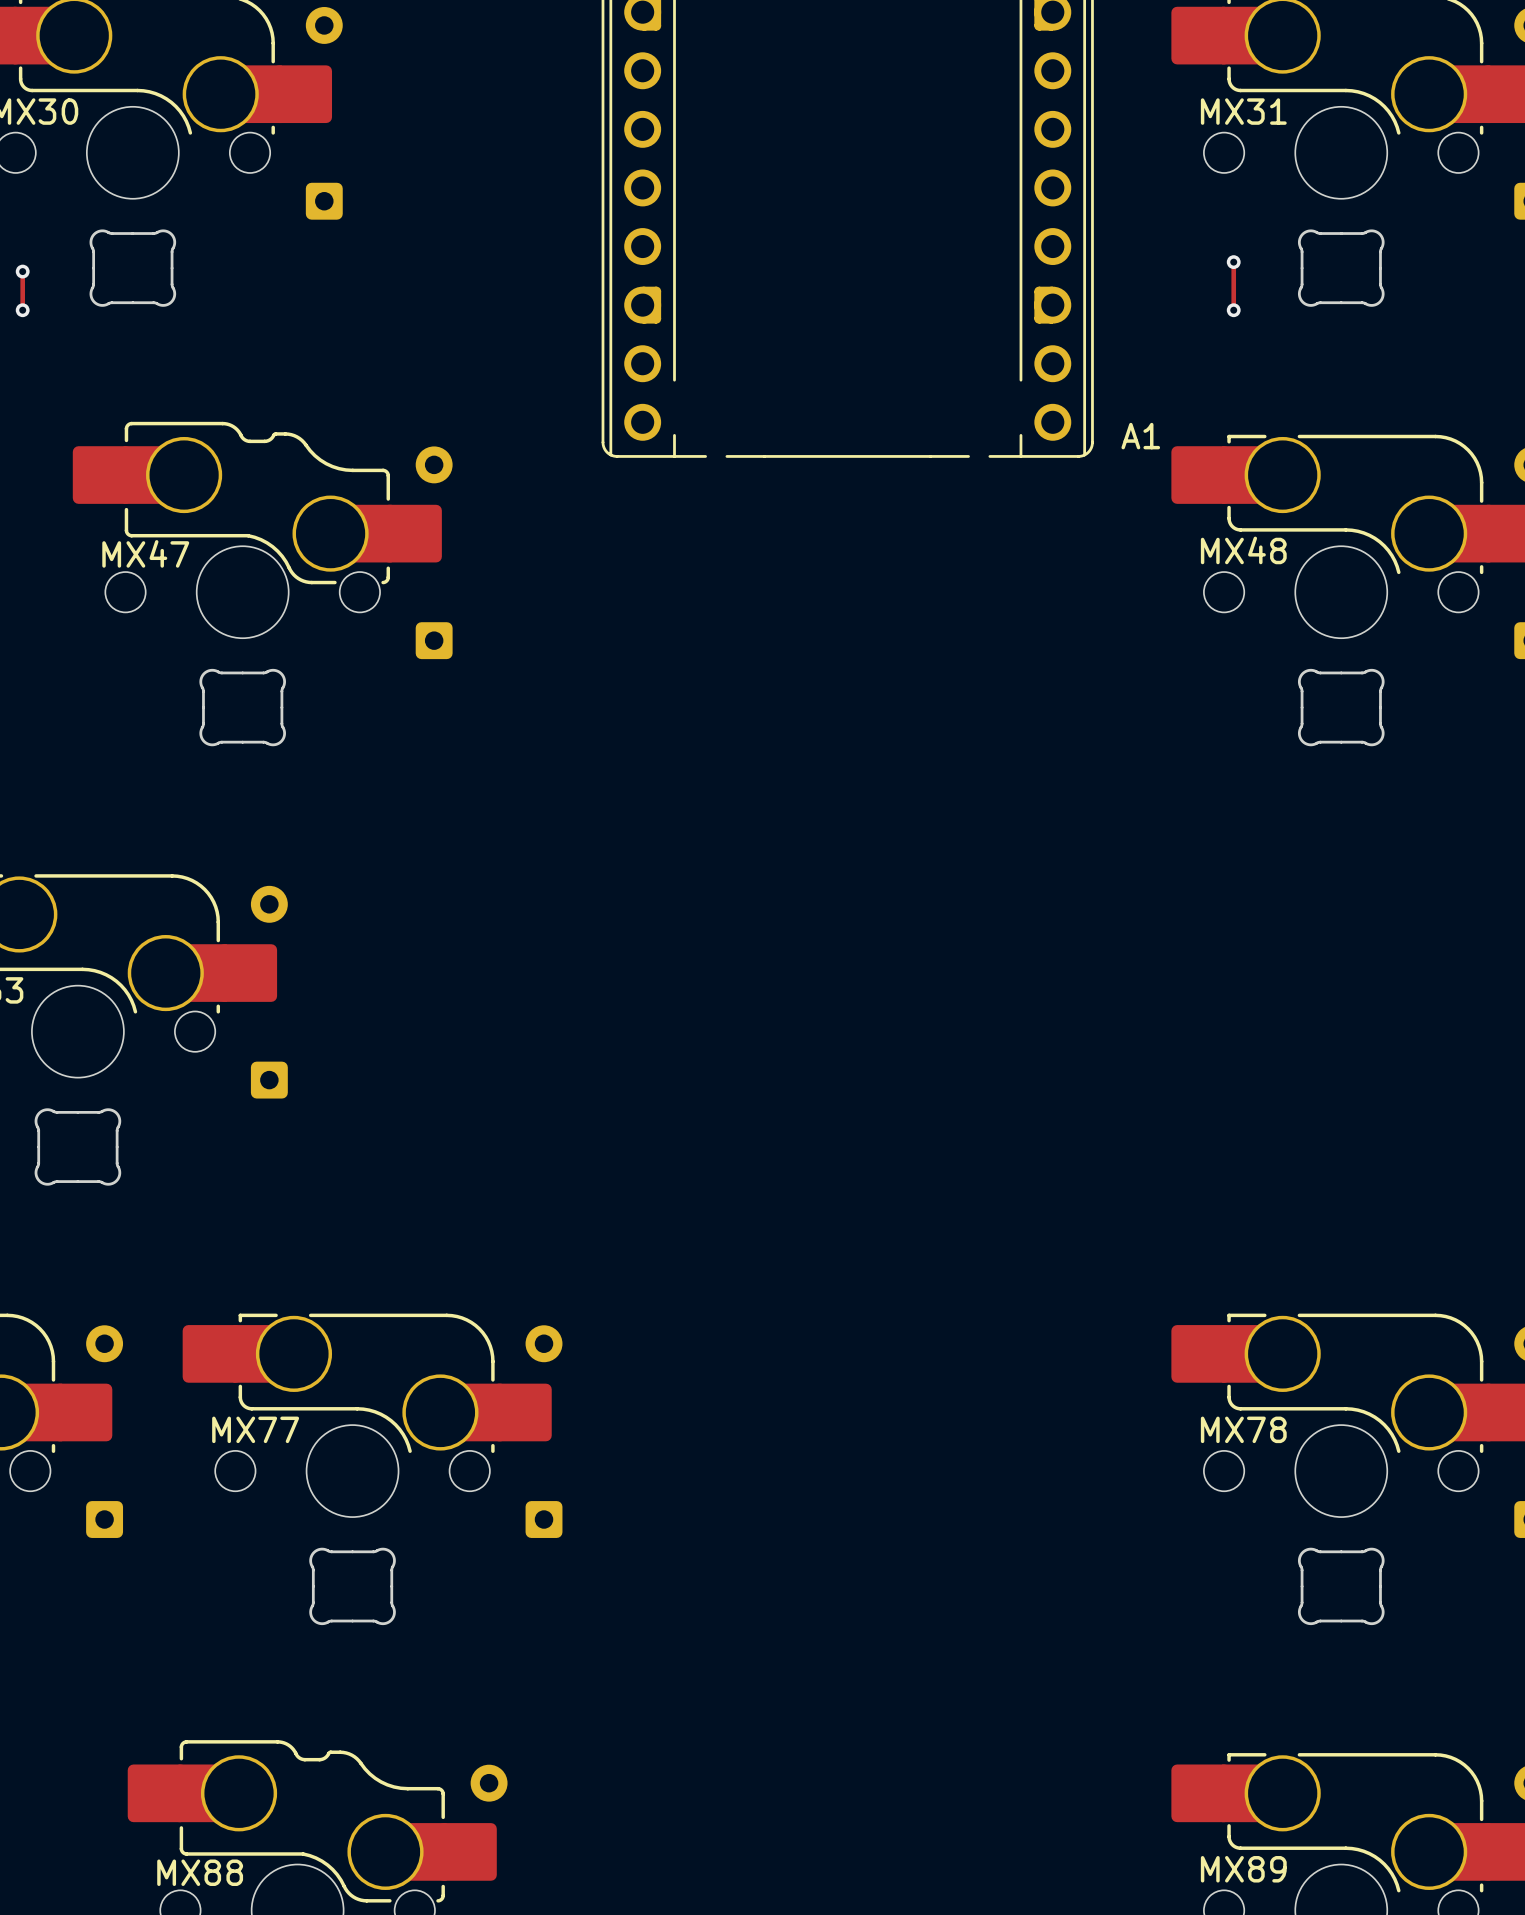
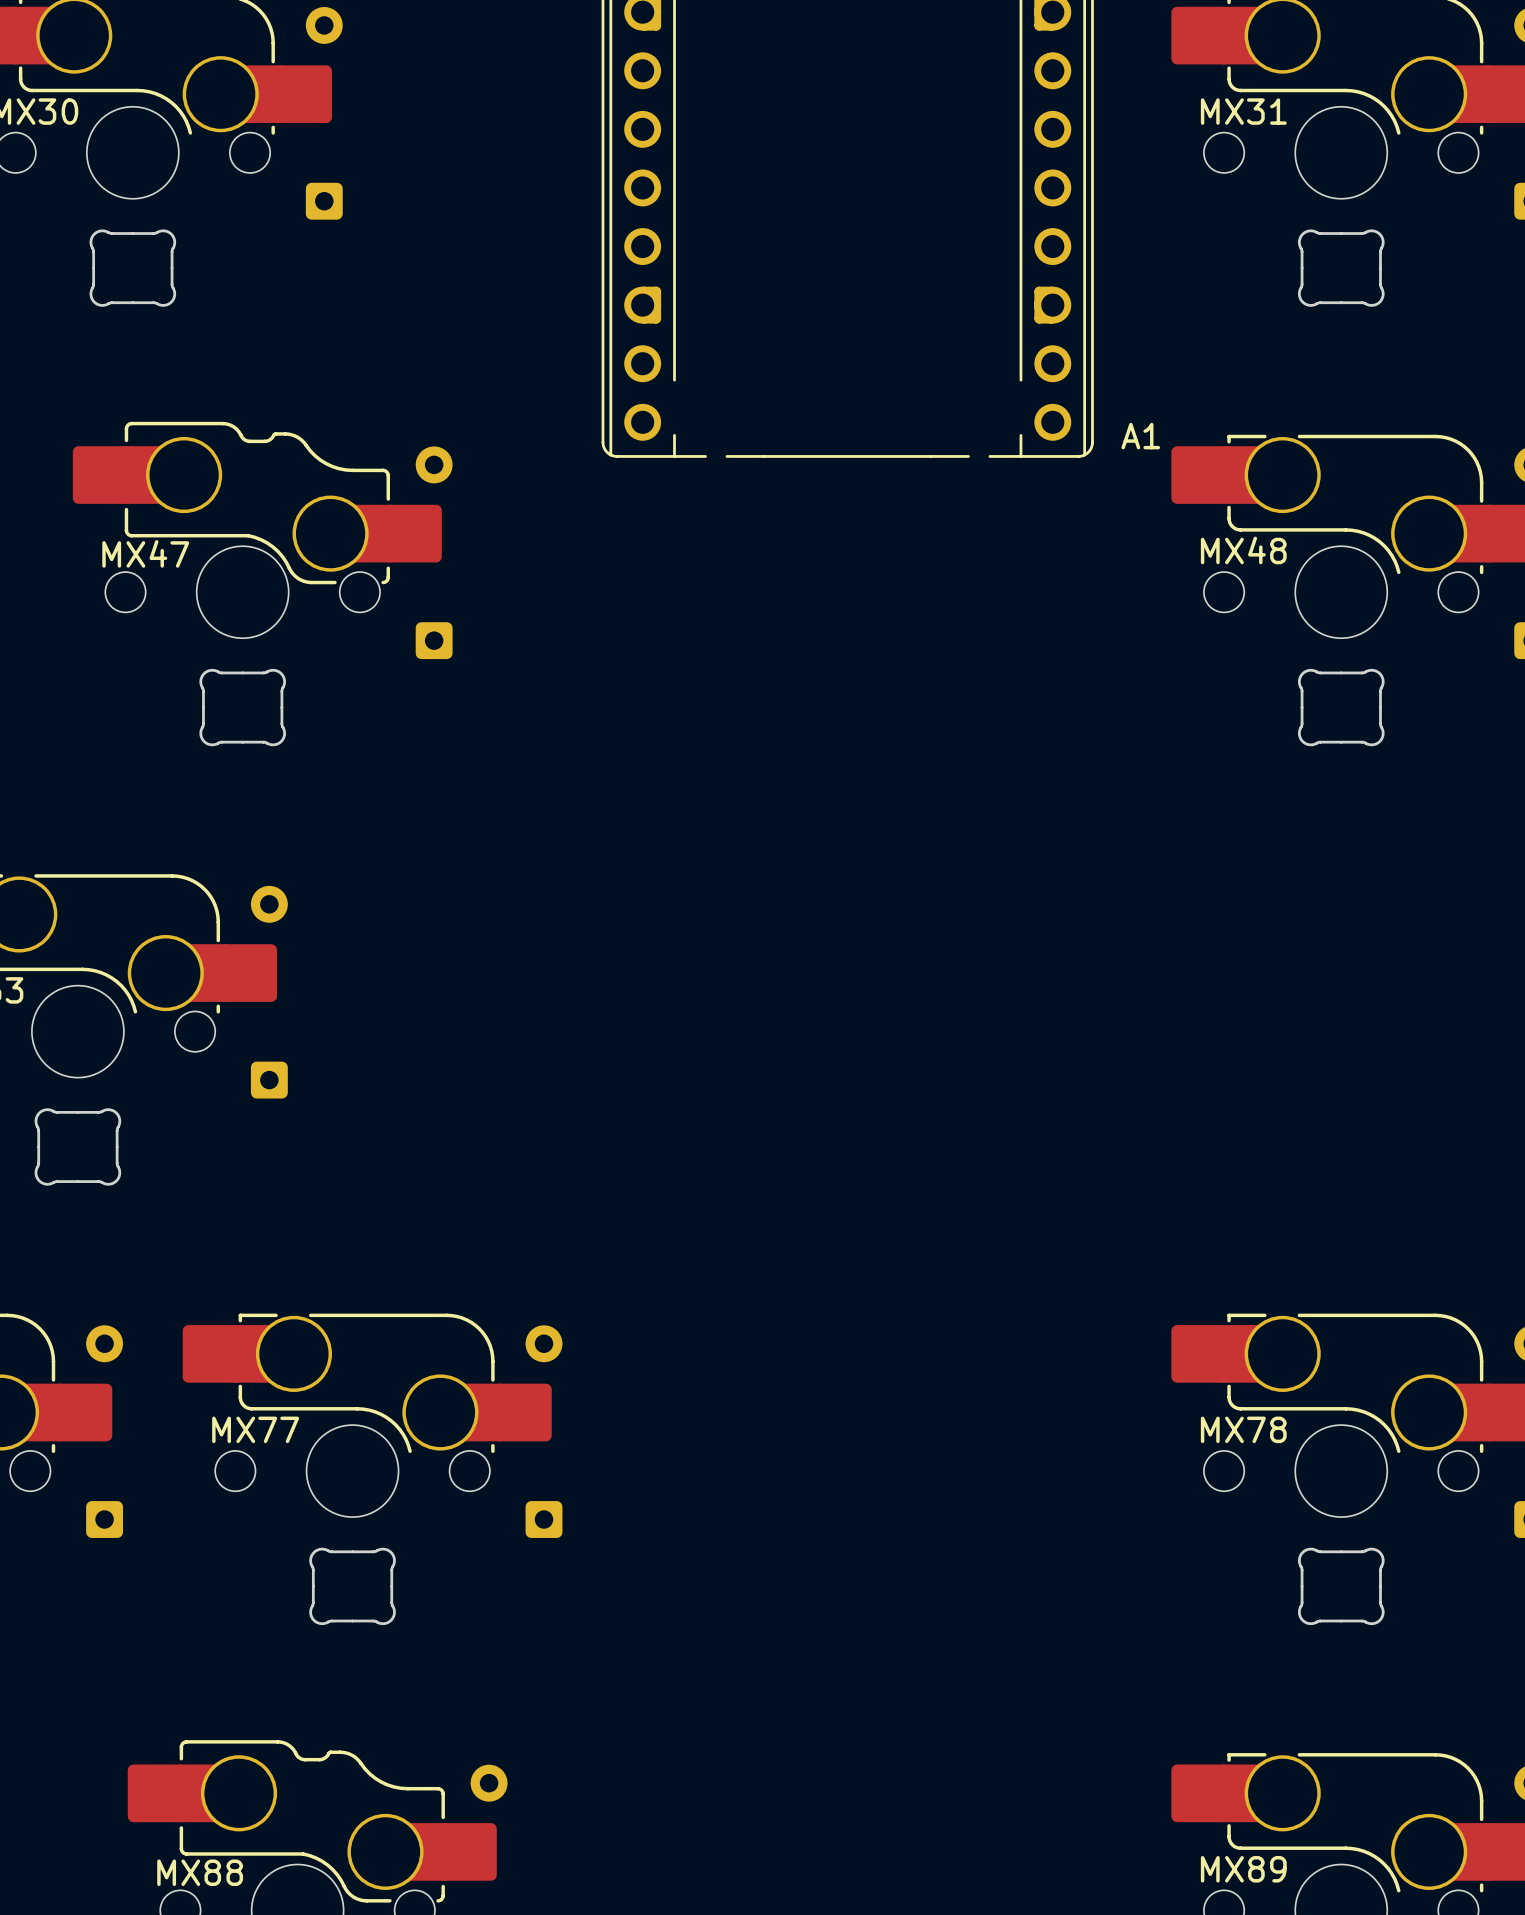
track: (1233, 262) (1233, 310) -> none
via: (1233, 262) -> none
track: (22, 271) (22, 310) -> none
via: (22, 271) -> none
via: (22, 310) -> none
via: (1233, 310) -> none

